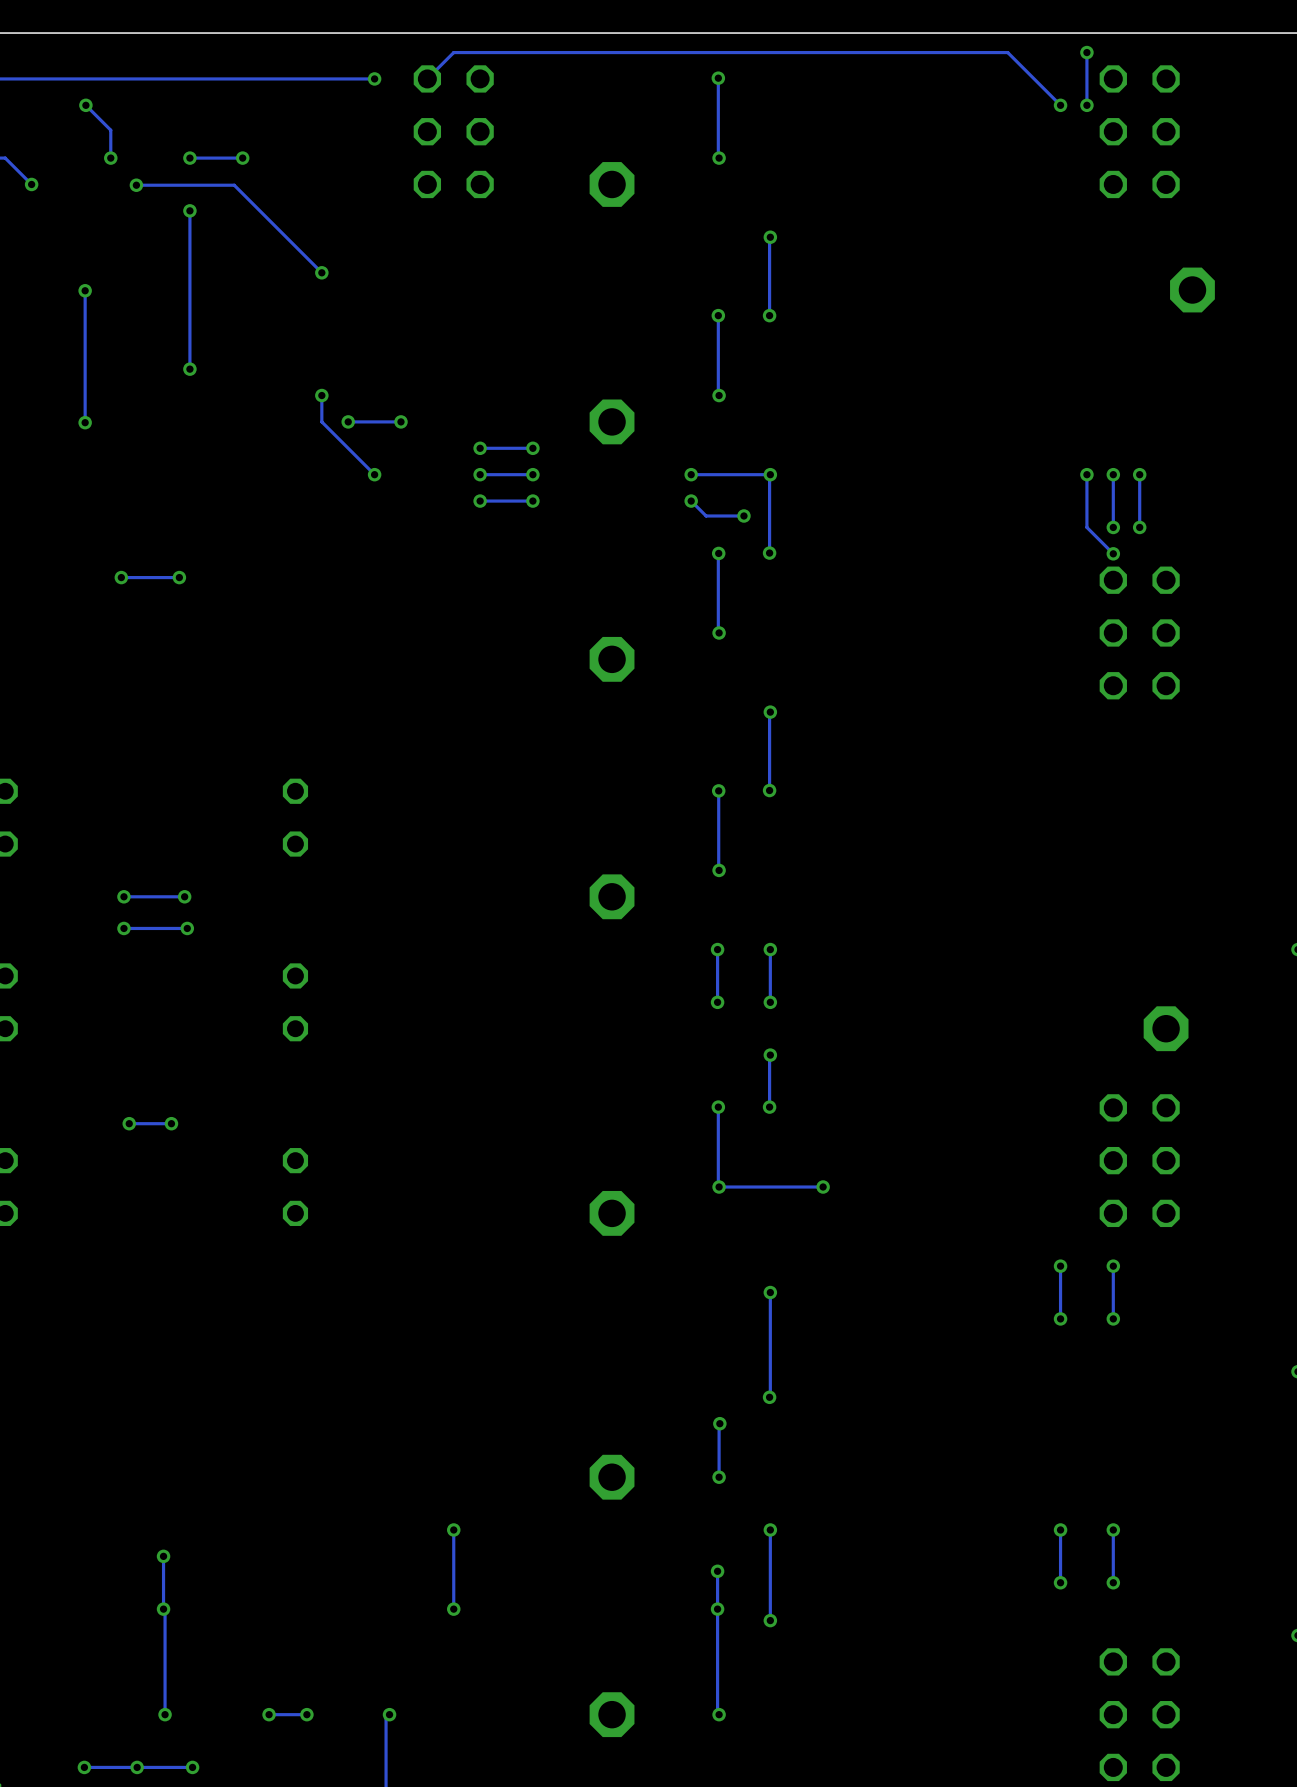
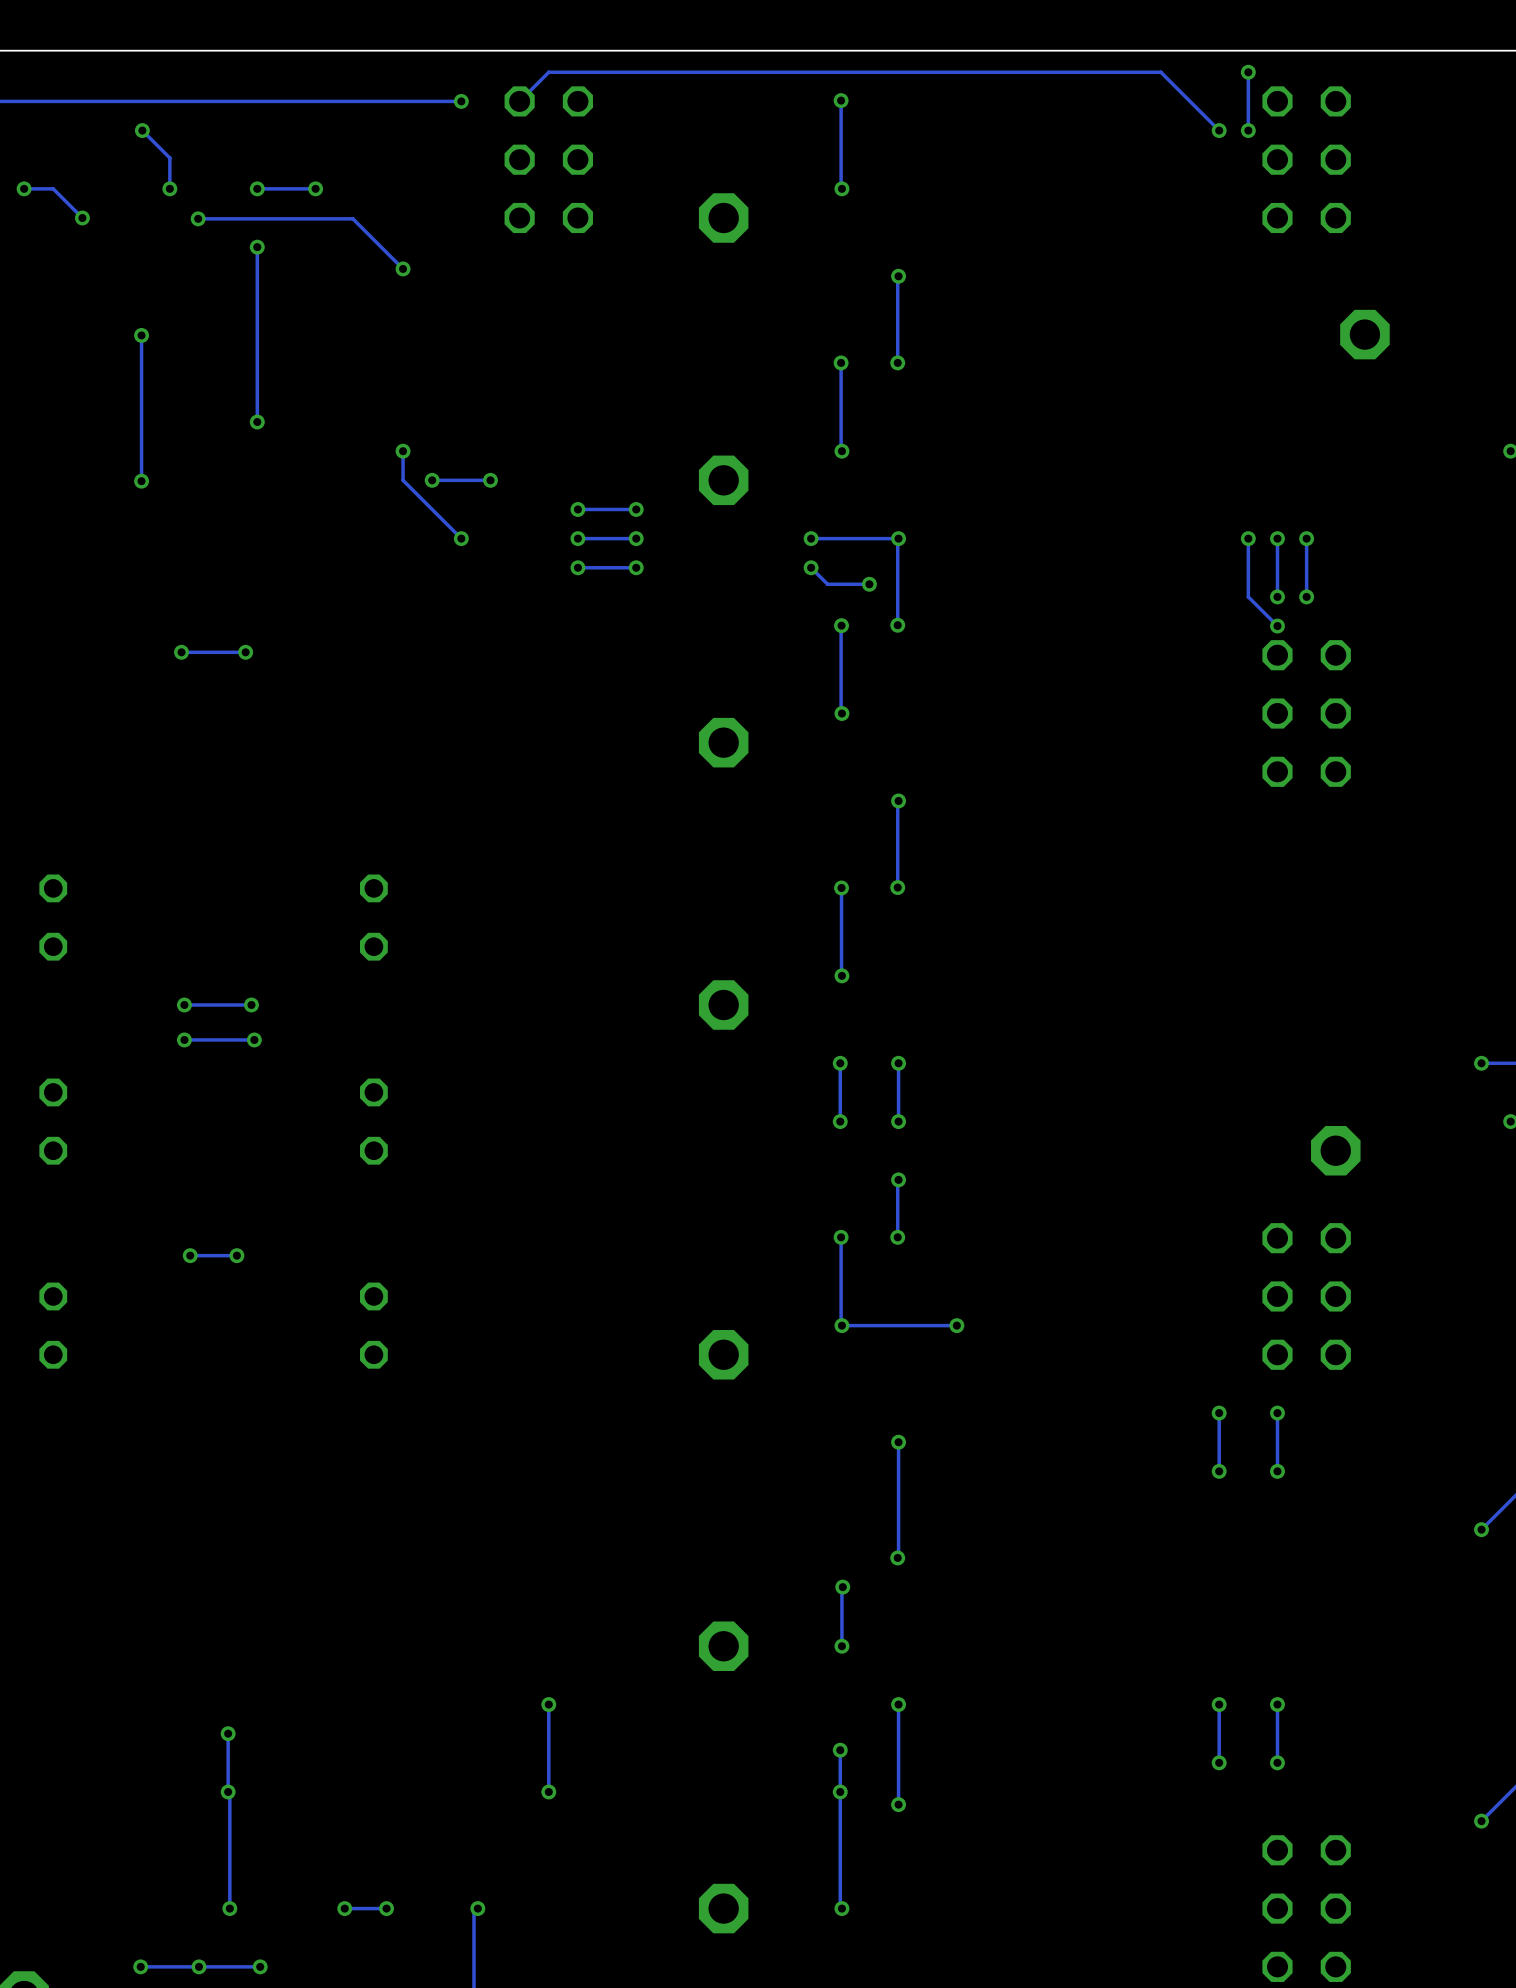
track: (234, 185) (321, 272) -> (306, 218) (352, 218) (403, 268)
via position: (321, 272) -> (403, 268)

